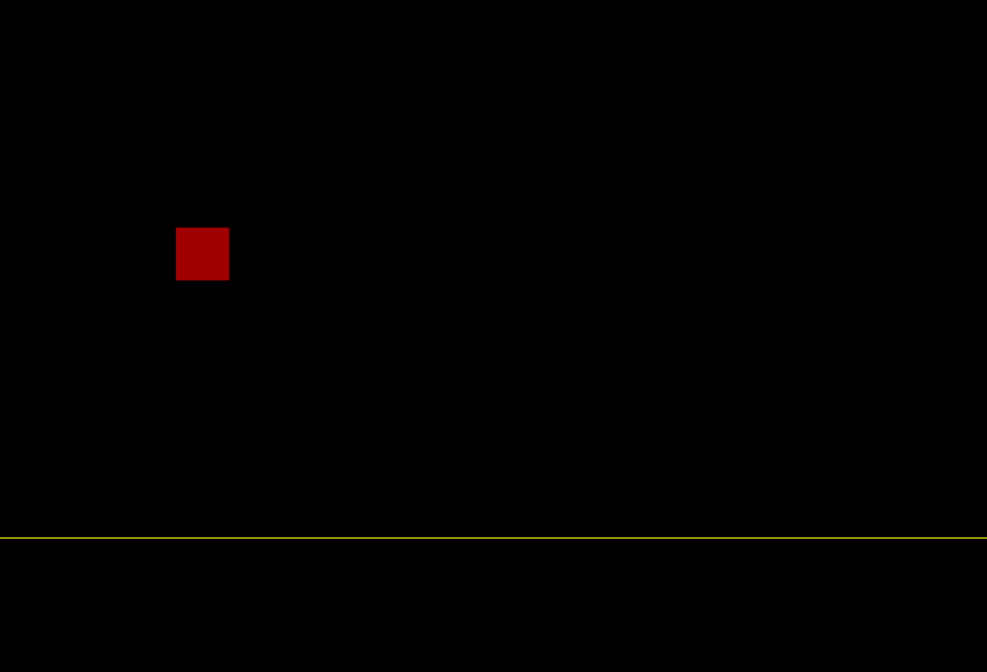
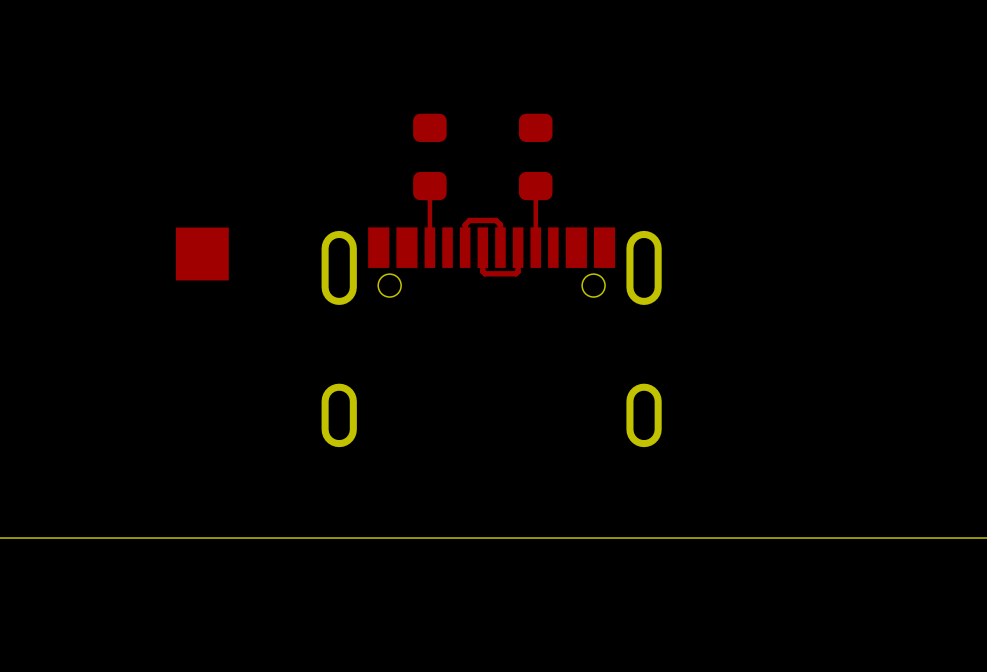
part: none -> (429, 156)
part: none -> (535, 156)
top track: none -> (429, 186) (429, 247)
top track: none -> (535, 186) (535, 247)
top track: none -> (500, 247) (500, 224) (496, 220) (469, 220) (465, 224) (465, 247)
top track: none -> (518, 247) (518, 271) (515, 273) (484, 273) (482, 271) (482, 247)
part: none -> (491, 337)

